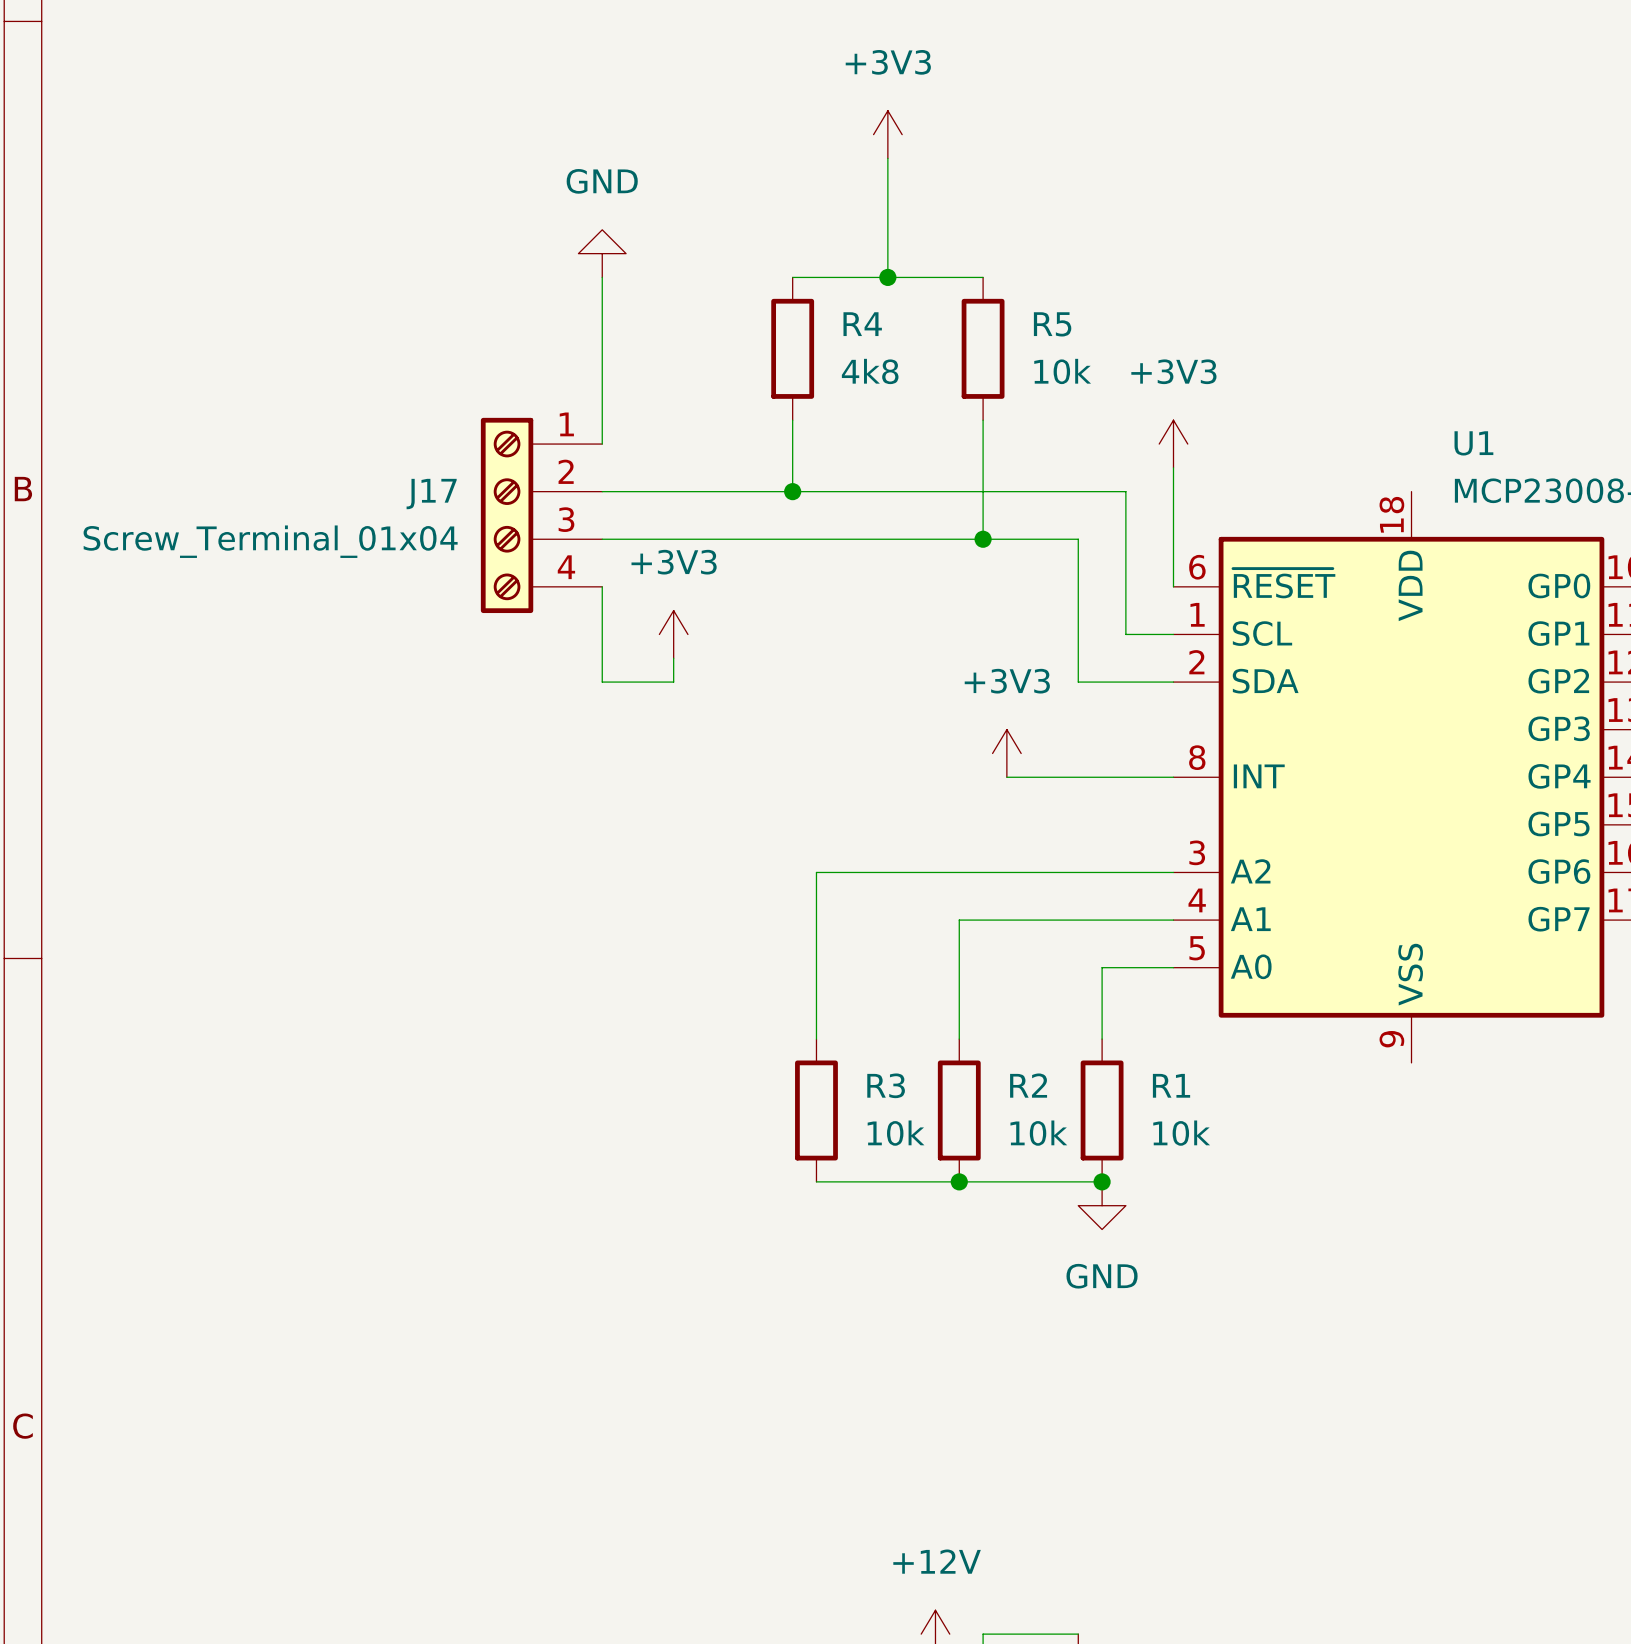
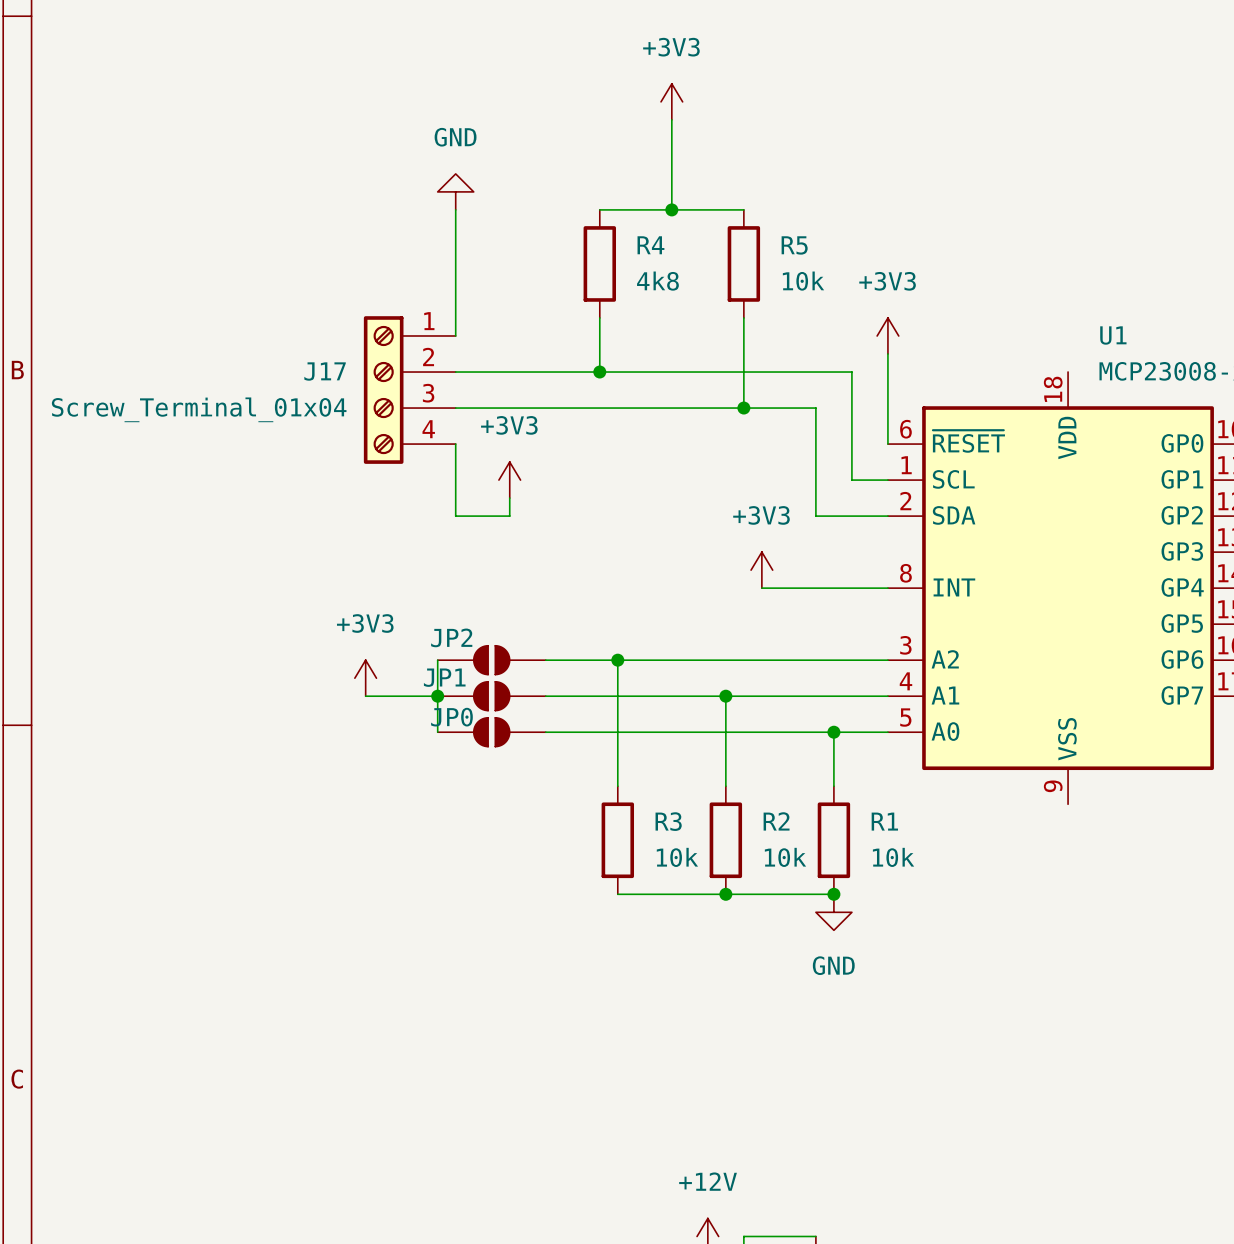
wire: none -> (437, 660) (437, 732)
JP2: none -> (491, 660)
wire: none -> (545, 660) (617, 660)
junction: none -> (617, 660)
power symbol: none -> +3V3 (365, 678)
wire: none -> (365, 696) (437, 696)
junction: none -> (437, 696)
JP1: none -> (491, 696)
wire: none -> (545, 696) (725, 696)
junction: none -> (725, 696)
JP0: none -> (491, 732)
wire: none -> (545, 732) (833, 732)
junction: none -> (833, 732)

